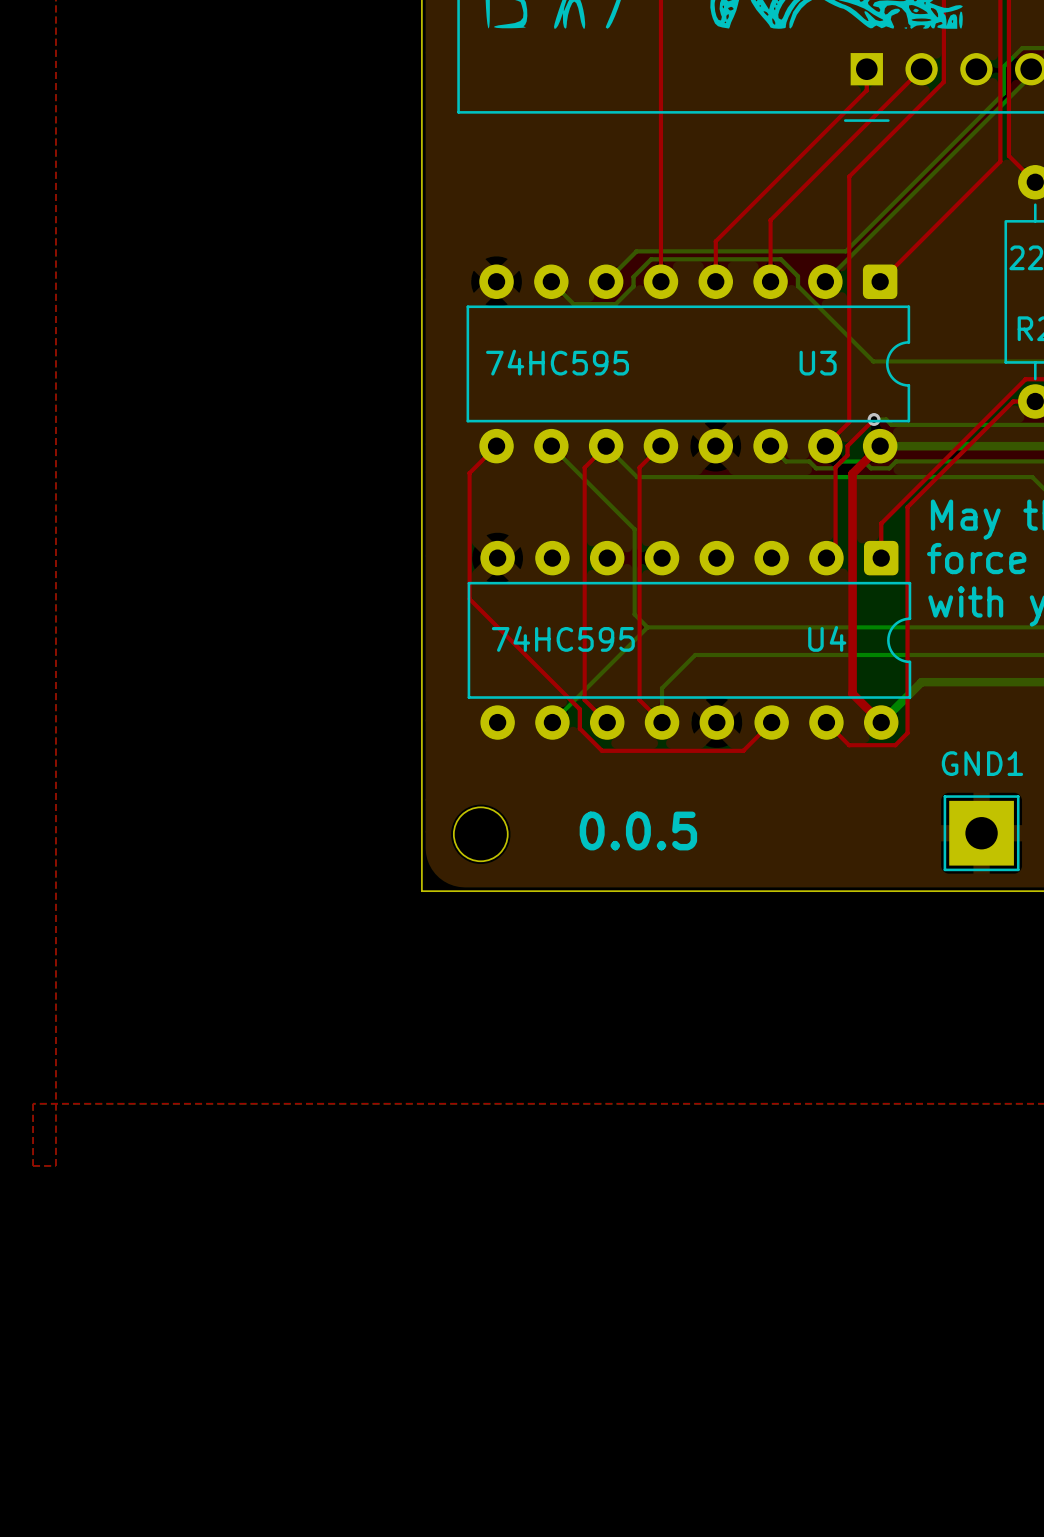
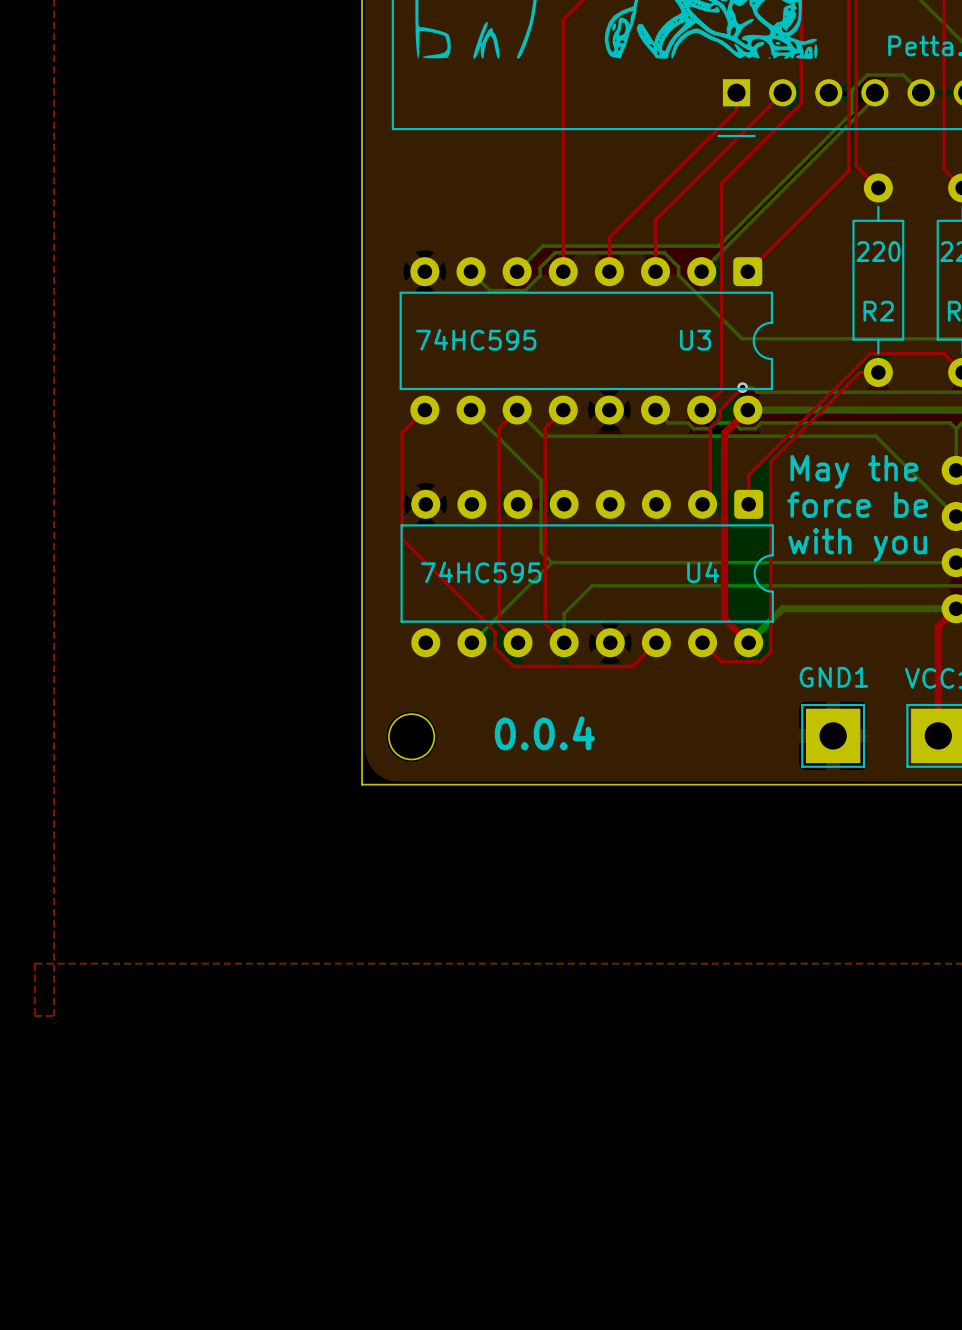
text: 0.0.5 (638, 830) -> 0.0.4 (544, 733)

